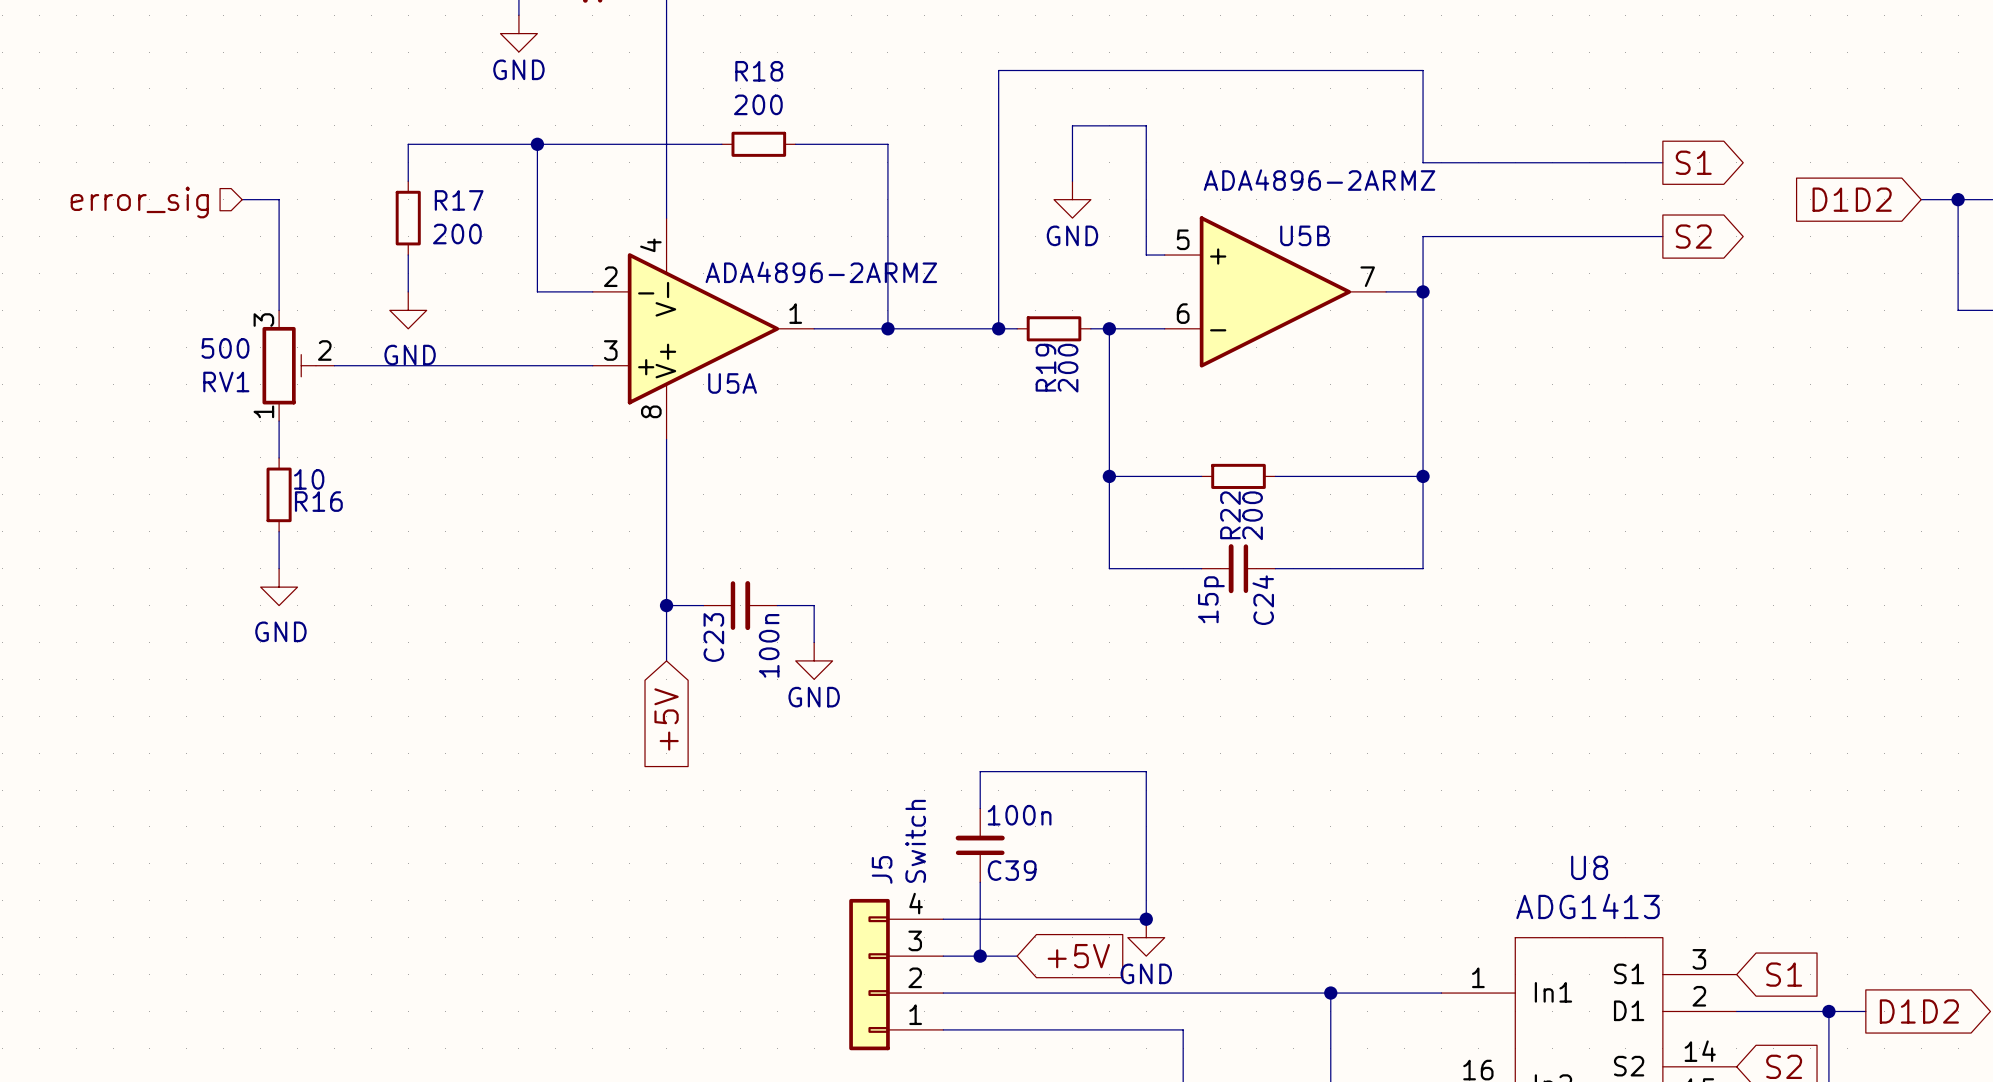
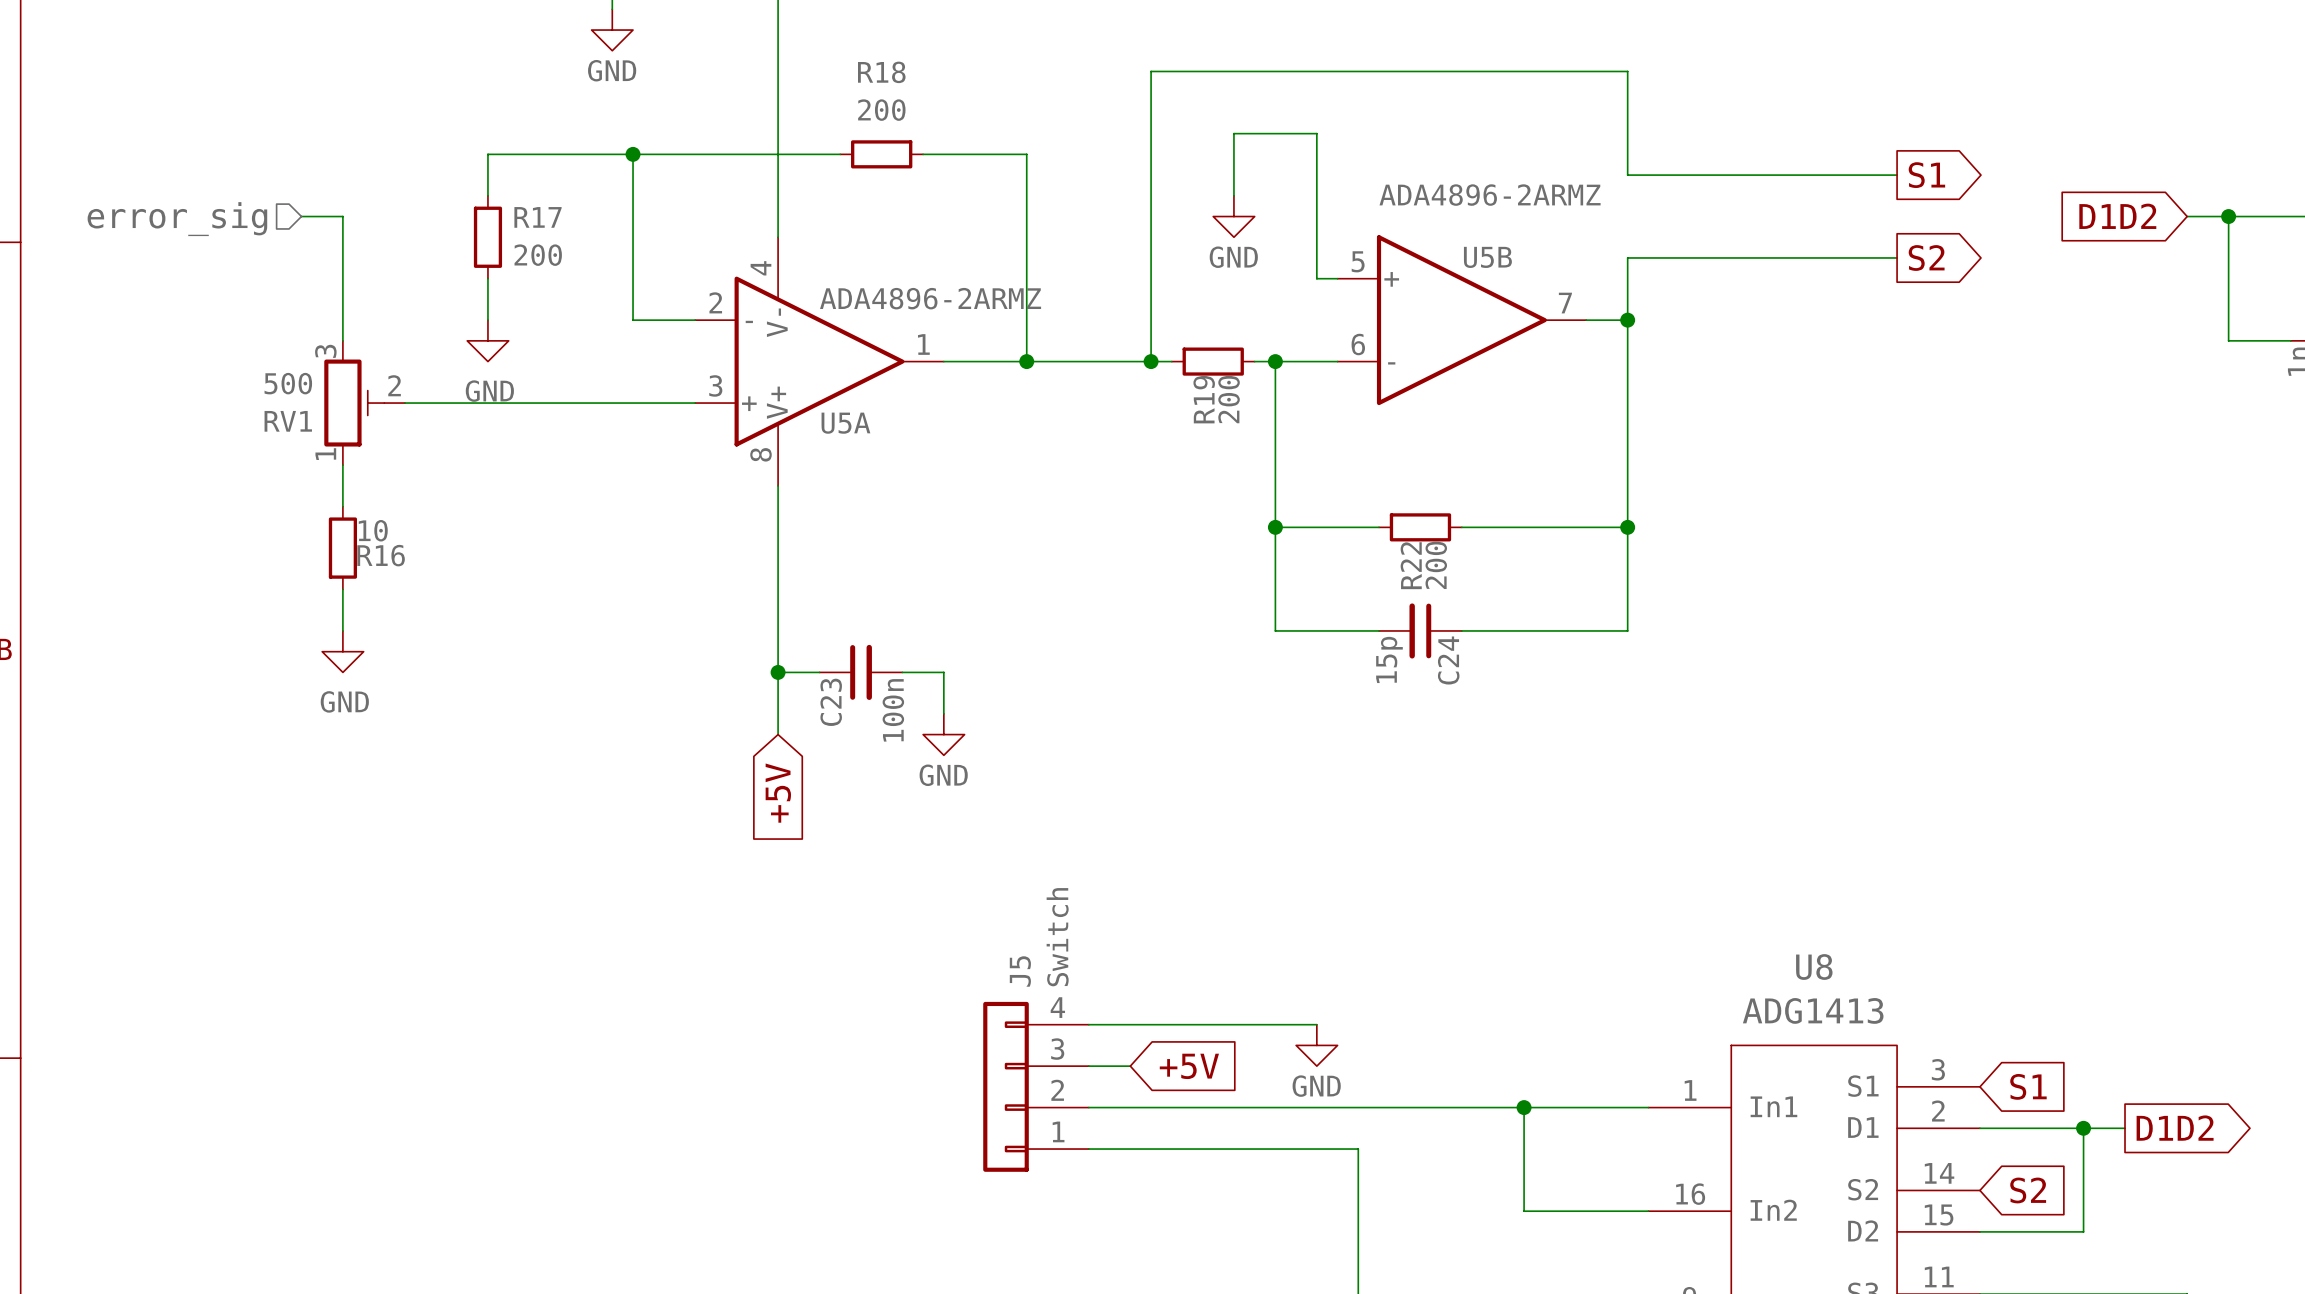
wire: (980, 808) (980, 771) (1146, 771) (1146, 919) -> none
C39: 100n (980, 845) -> none
wire: (980, 882) (980, 956) (1017, 956) -> none
junction: (1146, 919) -> none
junction: (980, 956) -> none
global label position: +5V (1078, 956) -> +5V (1189, 1066)

